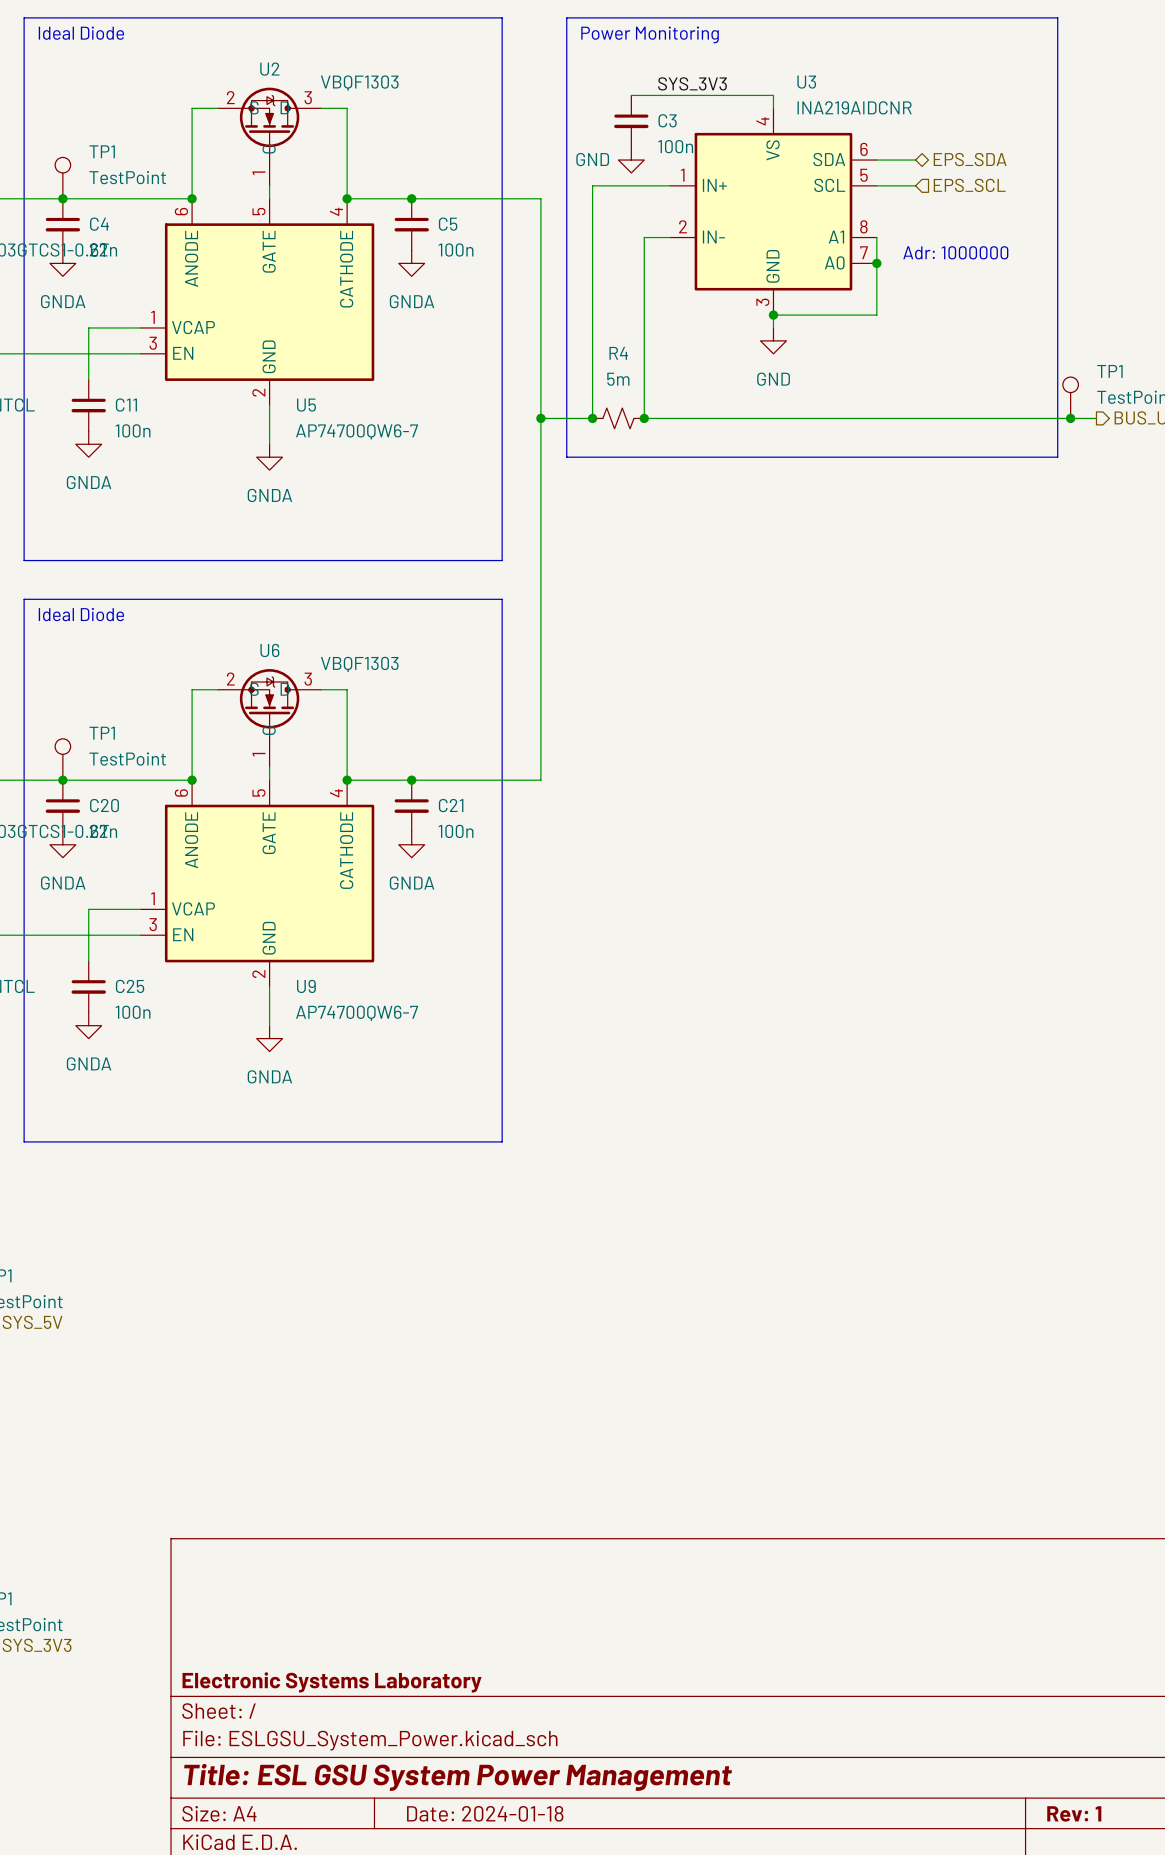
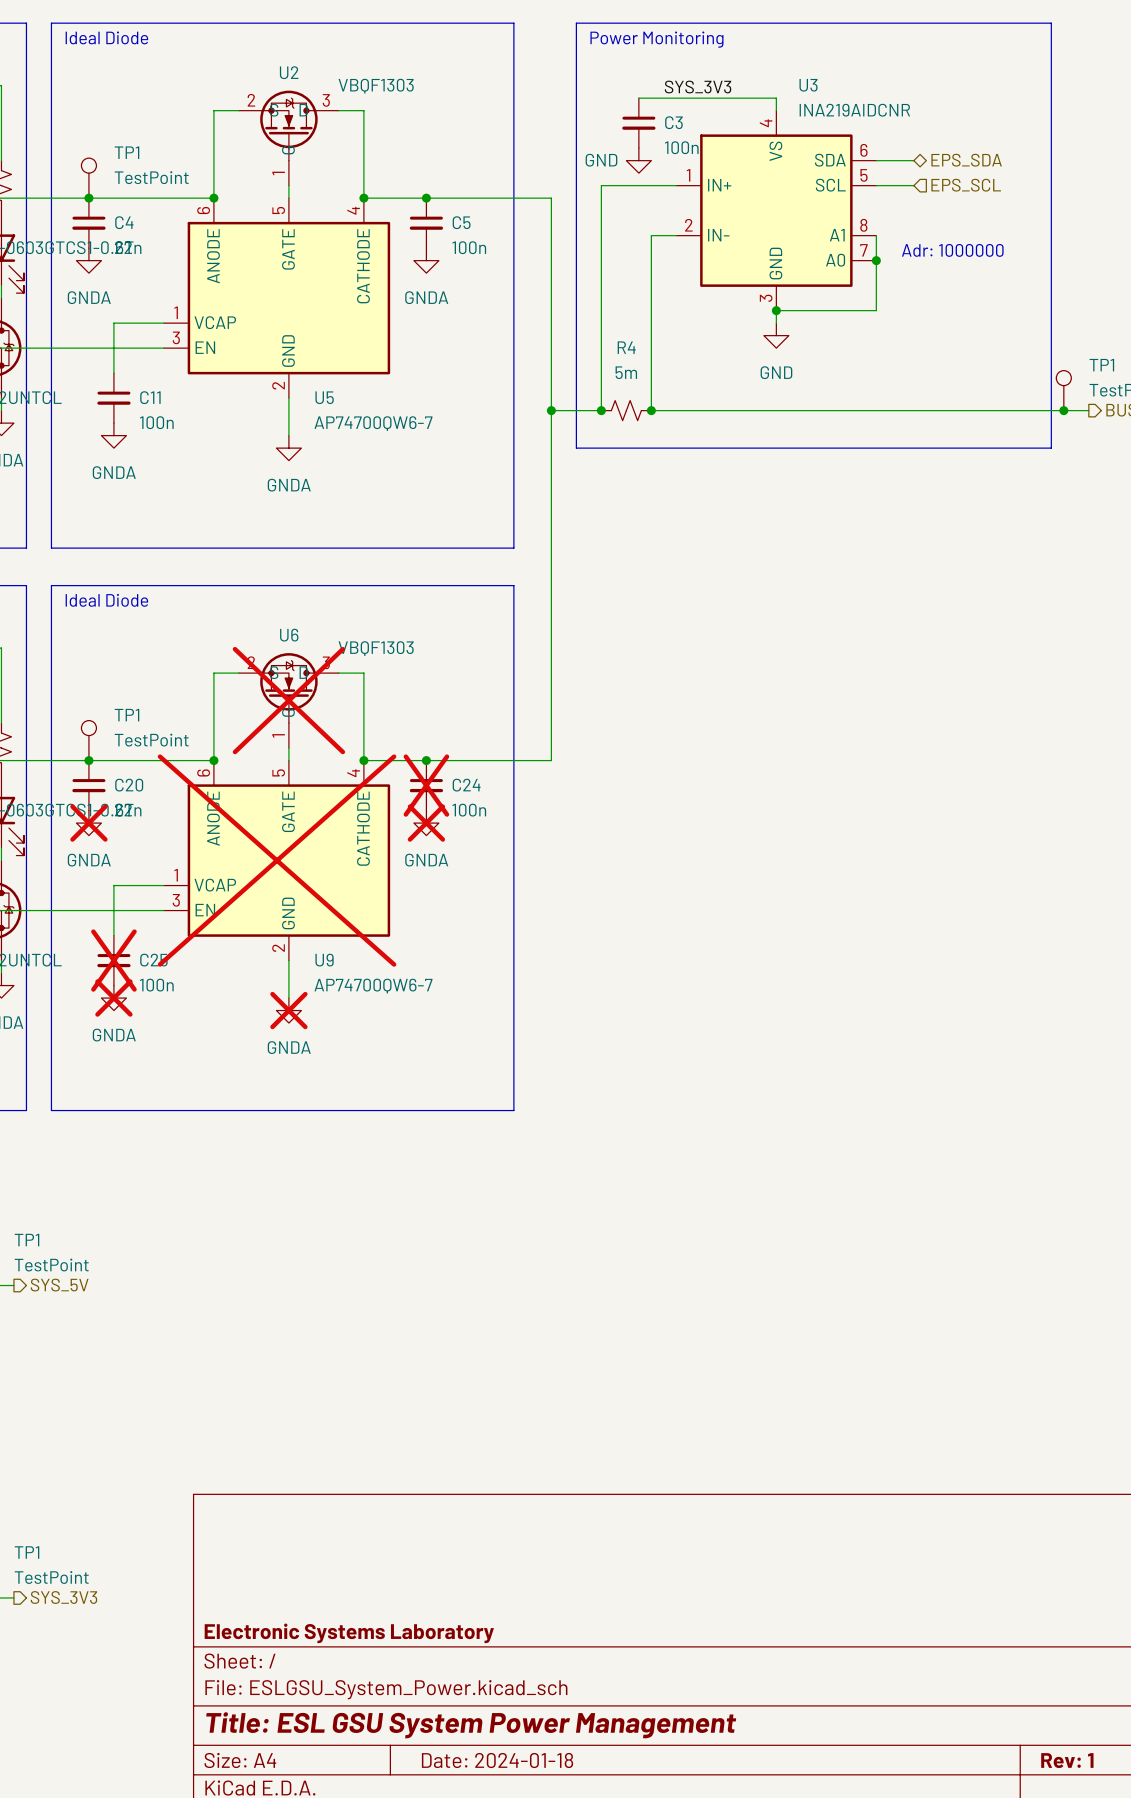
U6 do-not-place cross: none -> (288, 700)
C21 name: C21 (451, 805) -> C24 (466, 785)
C21 do-not-place cross: none -> (426, 785)
power symbol do-not-place cross: none -> (88, 823)
power symbol do-not-place cross: none -> (426, 823)
U9 do-not-place cross: none -> (277, 860)
C25 do-not-place cross: none -> (113, 960)
power symbol do-not-place cross: none -> (113, 998)
power symbol do-not-place cross: none -> (288, 1010)

